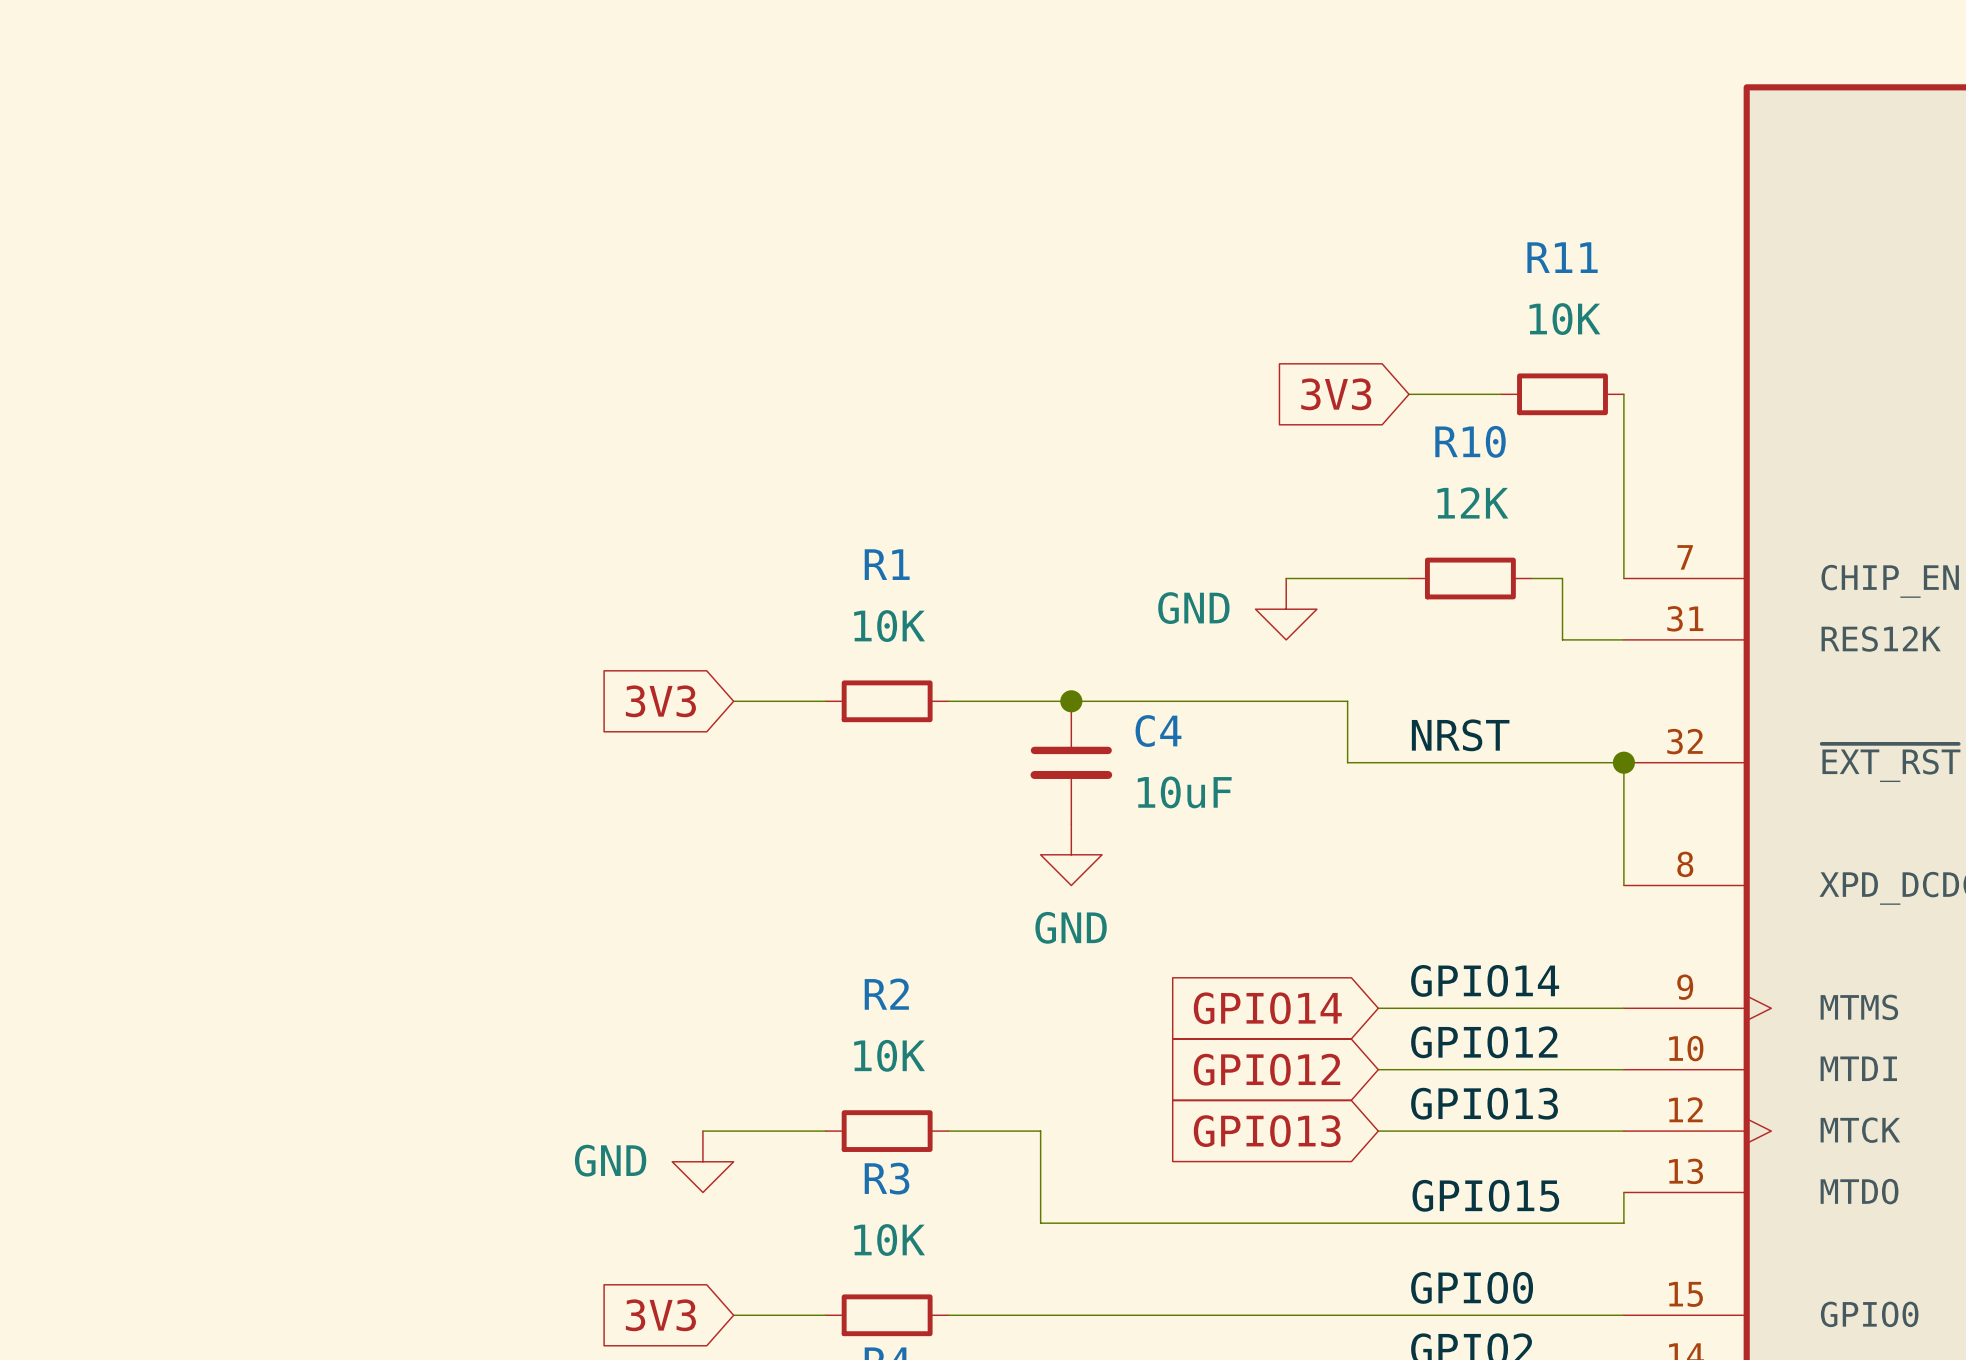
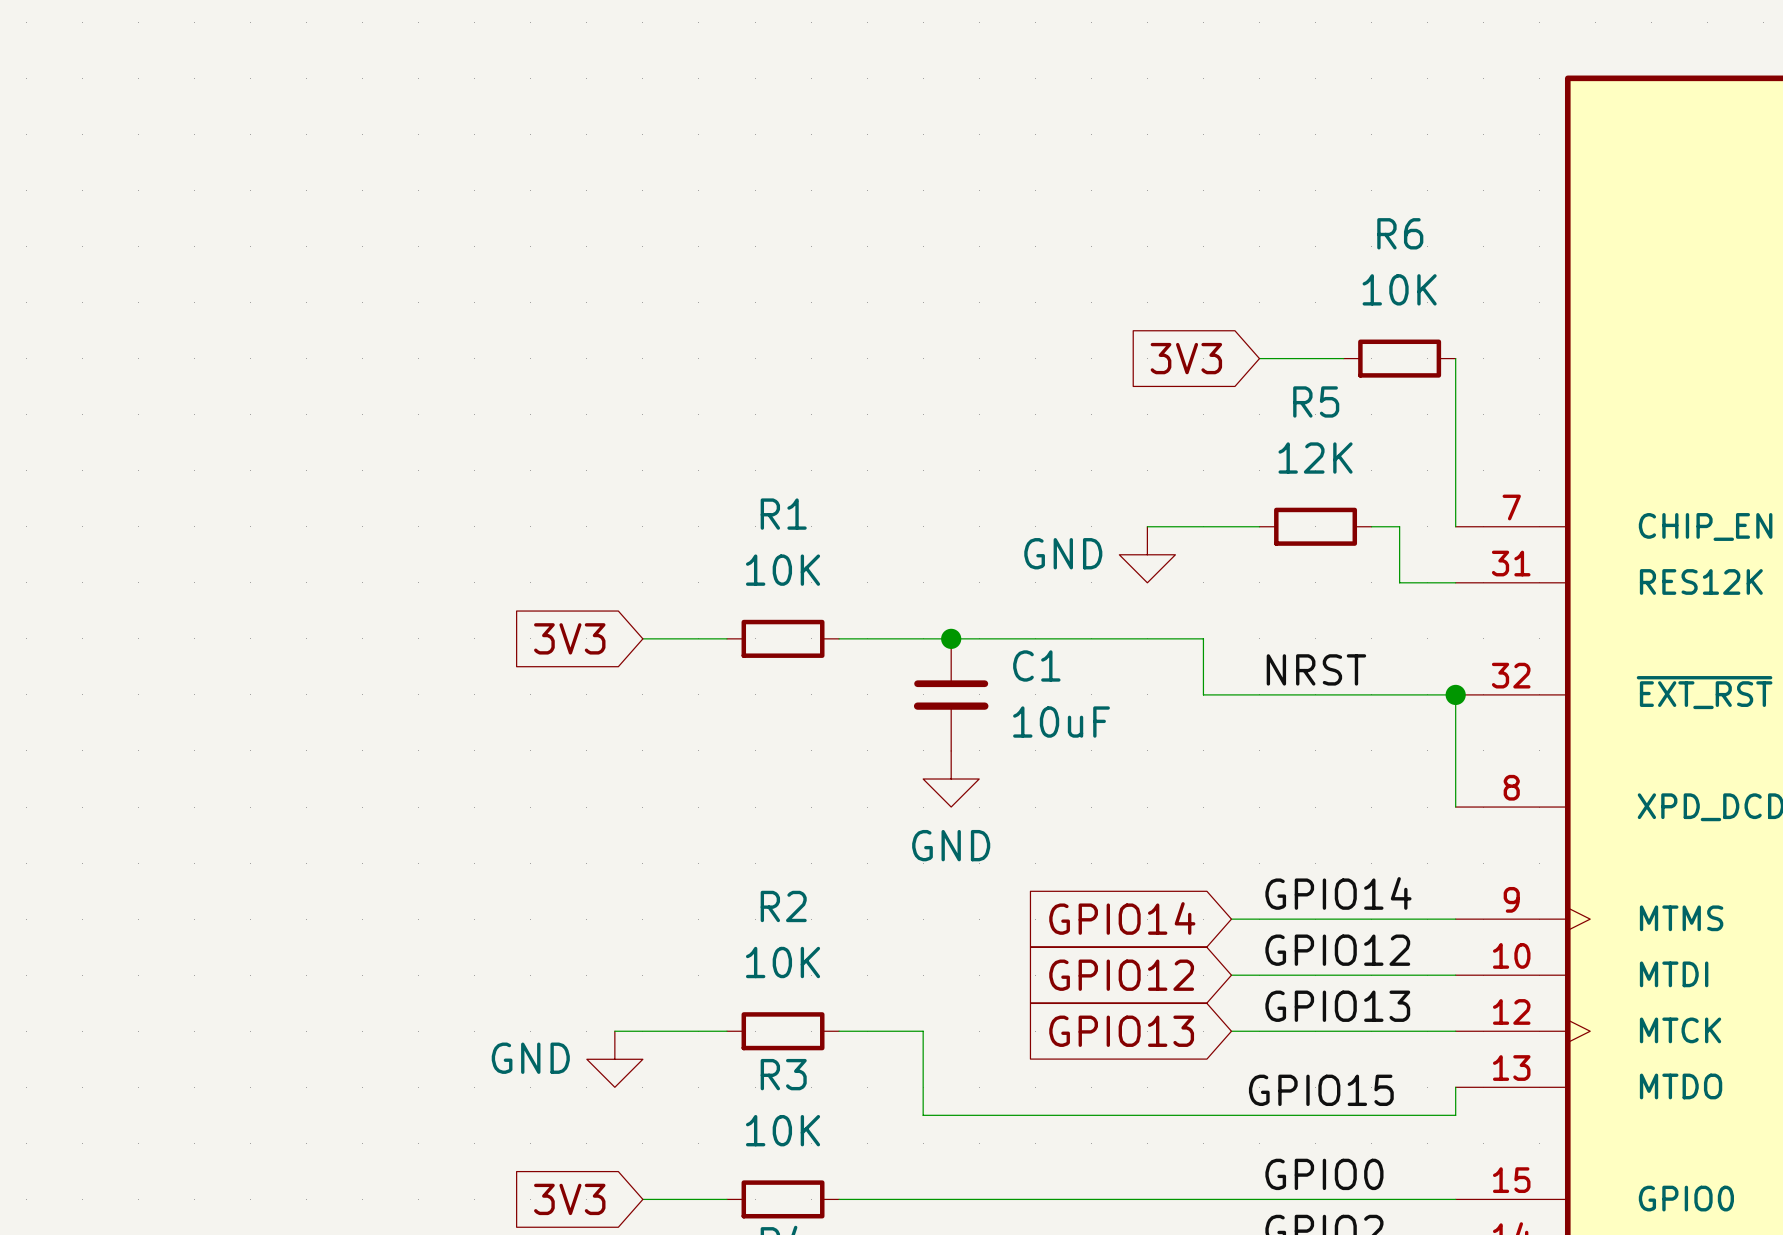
R11 name: R11 (1562, 257) -> R6 (1400, 233)
R10 name: R10 (1470, 441) -> R5 (1316, 401)
C4 name: C4 (1158, 731) -> C1 (1036, 665)

